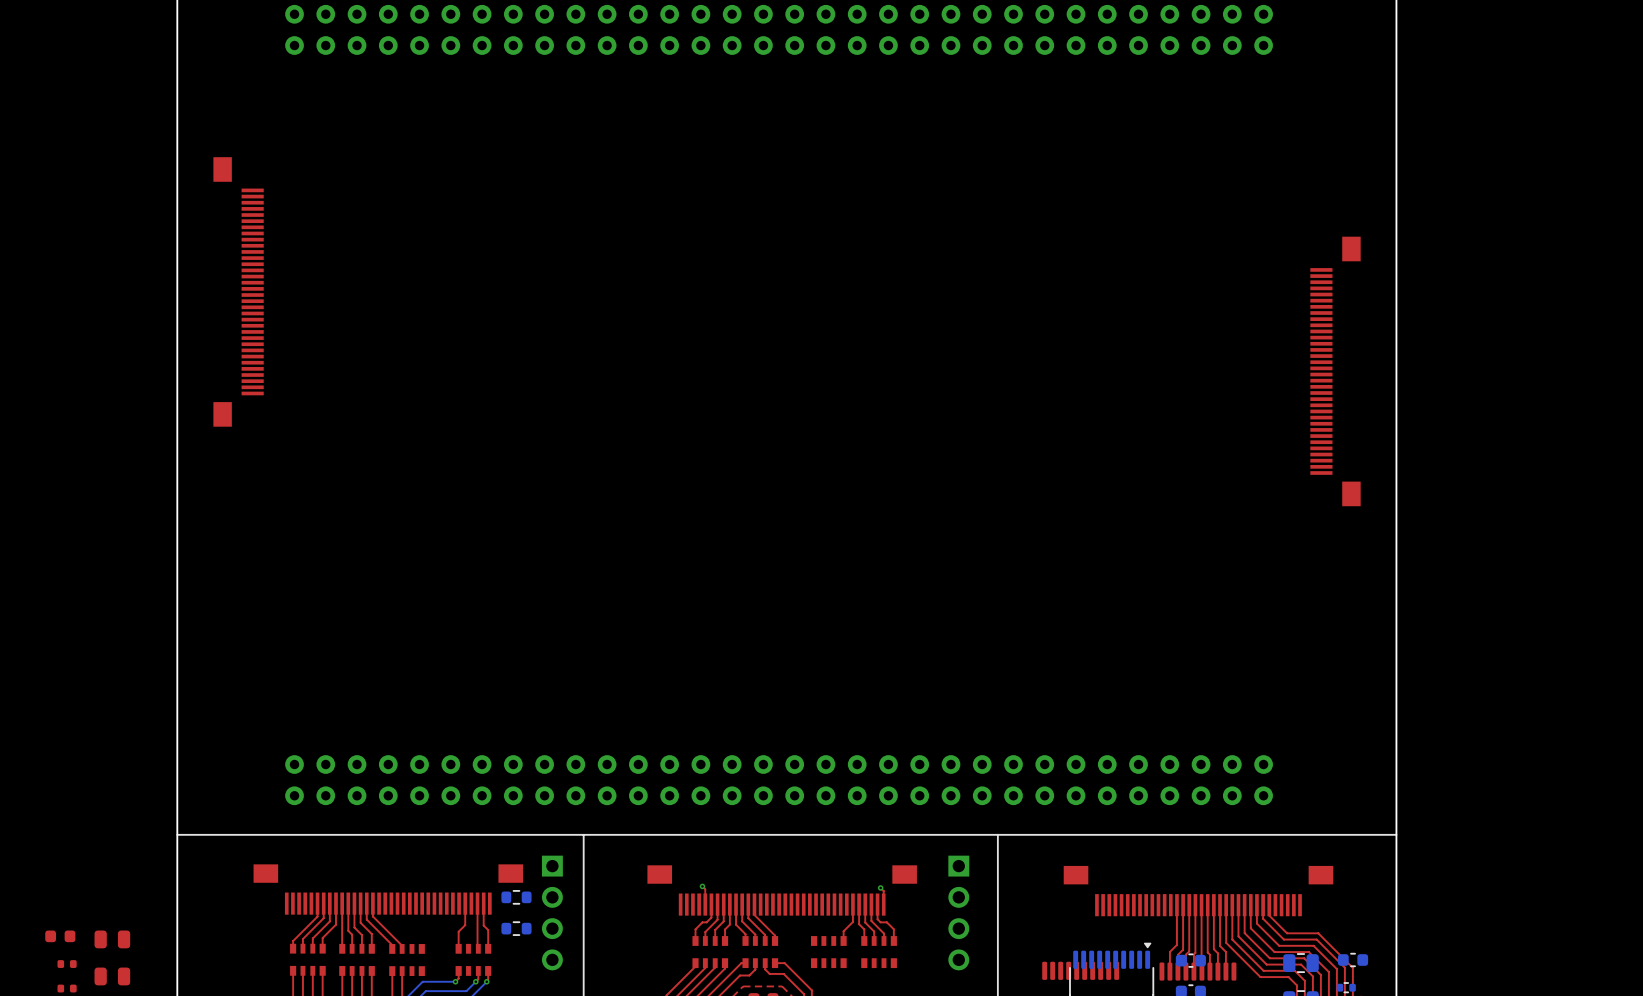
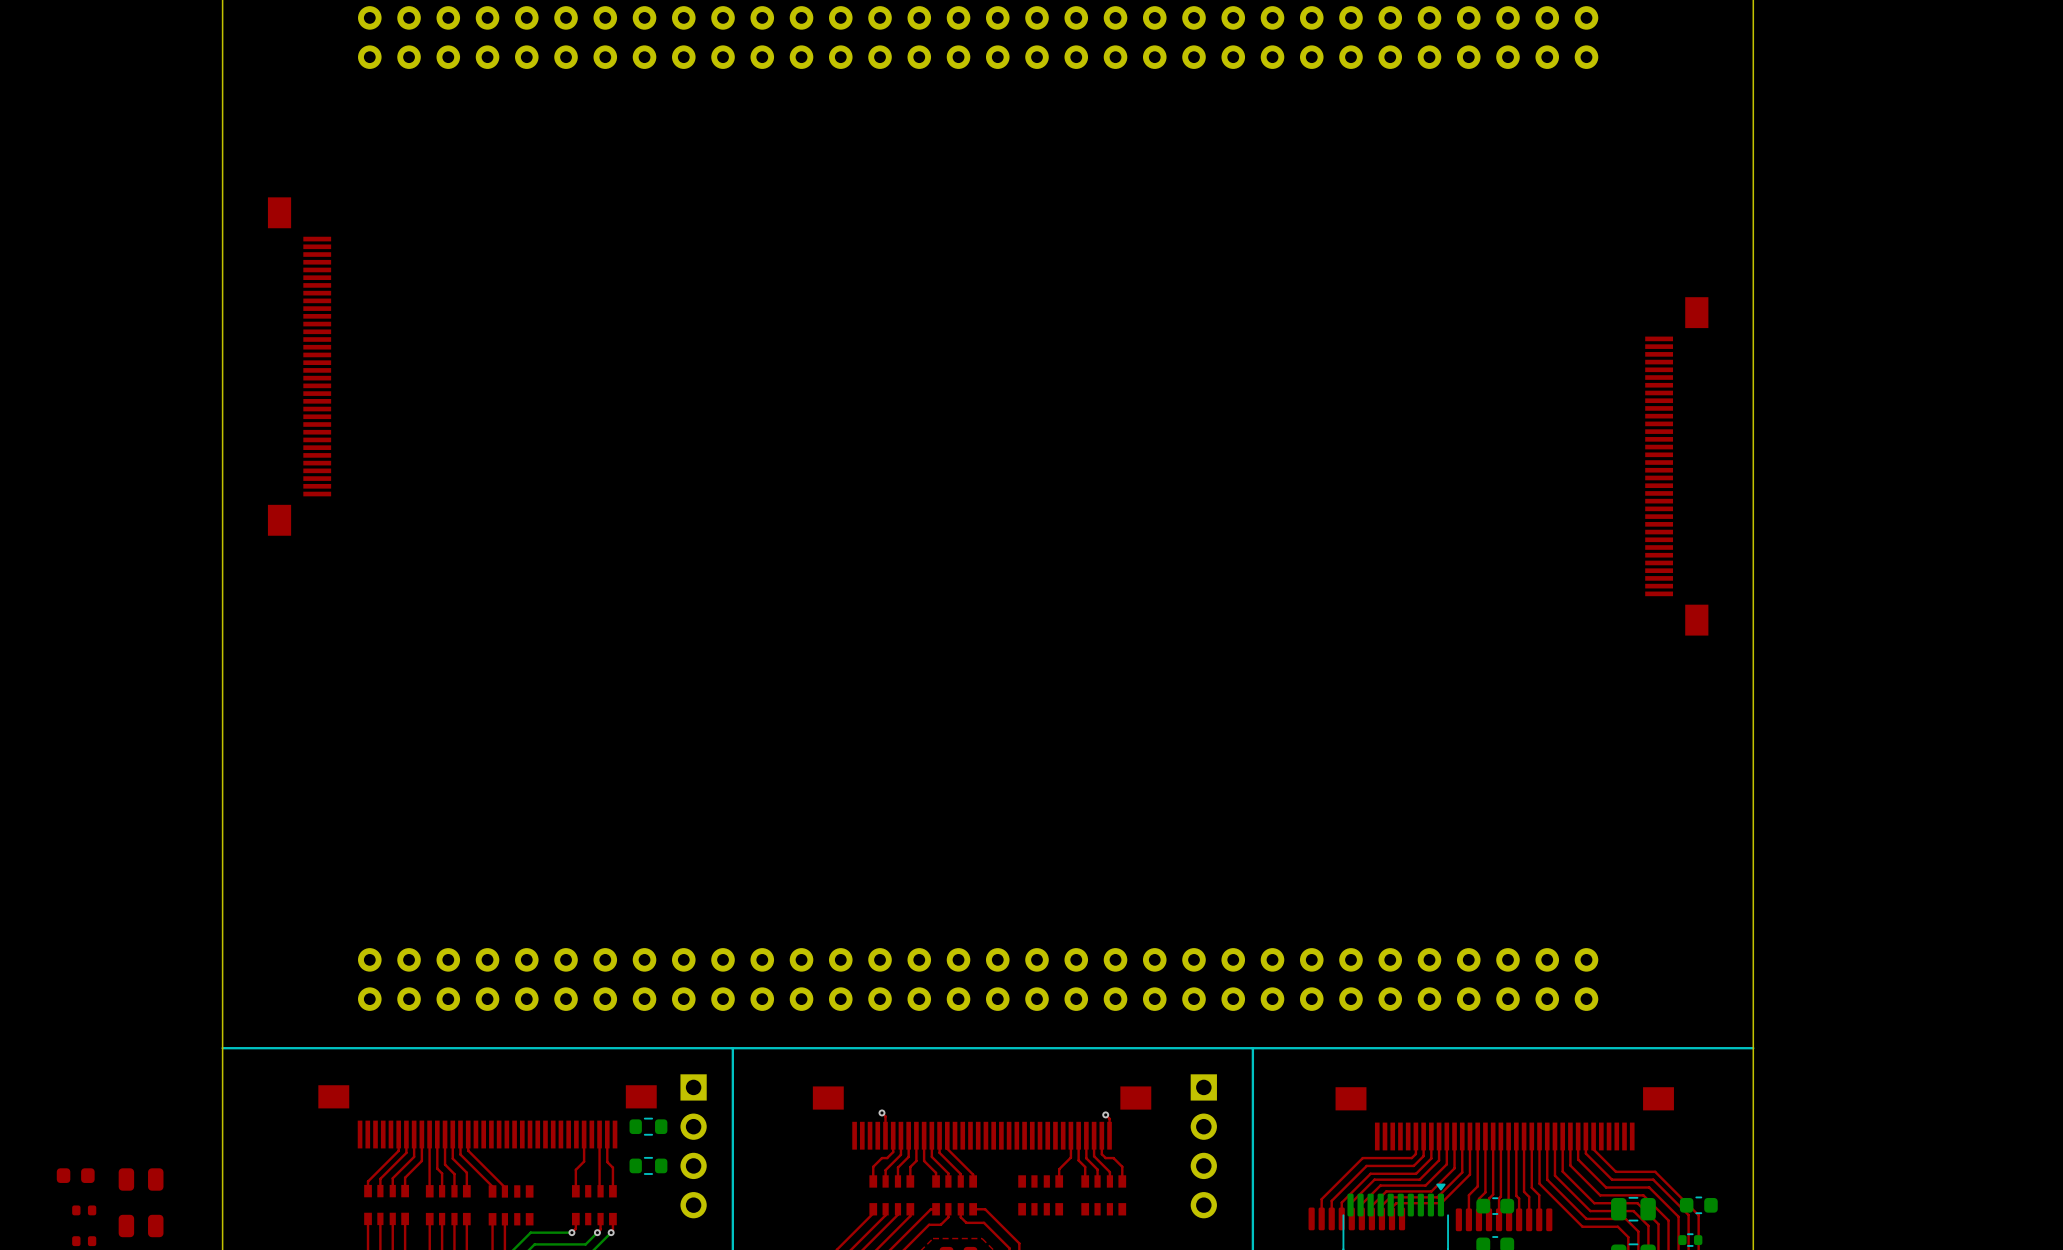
top track: none -> (1415, 1136) (1415, 1154) (1411, 1158) (1362, 1158) (1321, 1199) (1321, 1218)
top track: none -> (1423, 1136) (1423, 1156) (1413, 1165) (1366, 1165) (1331, 1200) (1331, 1218)
top track: none -> (1431, 1136) (1431, 1158) (1416, 1173) (1370, 1173) (1341, 1202) (1341, 1218)
top track: none -> (1439, 1136) (1439, 1160) (1419, 1179) (1374, 1179) (1351, 1202) (1351, 1218)
top track: none -> (1446, 1136) (1446, 1164) (1425, 1185) (1380, 1185) (1361, 1204) (1361, 1218)
top track: none -> (1454, 1136) (1454, 1168) (1431, 1191) (1386, 1191) (1371, 1205) (1371, 1218)
top track: none -> (1462, 1136) (1462, 1172) (1437, 1197) (1390, 1197) (1381, 1205) (1381, 1218)
top track: none -> (1469, 1136) (1469, 1174) (1441, 1203) (1396, 1203) (1391, 1207) (1391, 1218)

